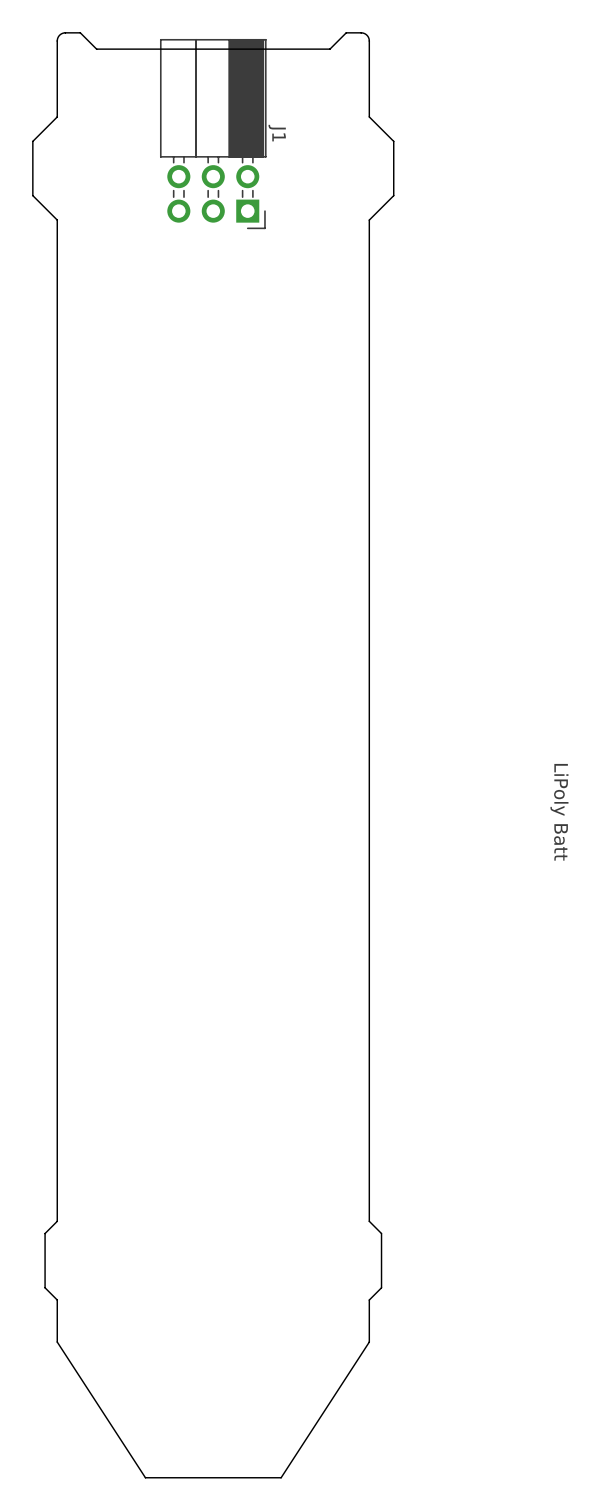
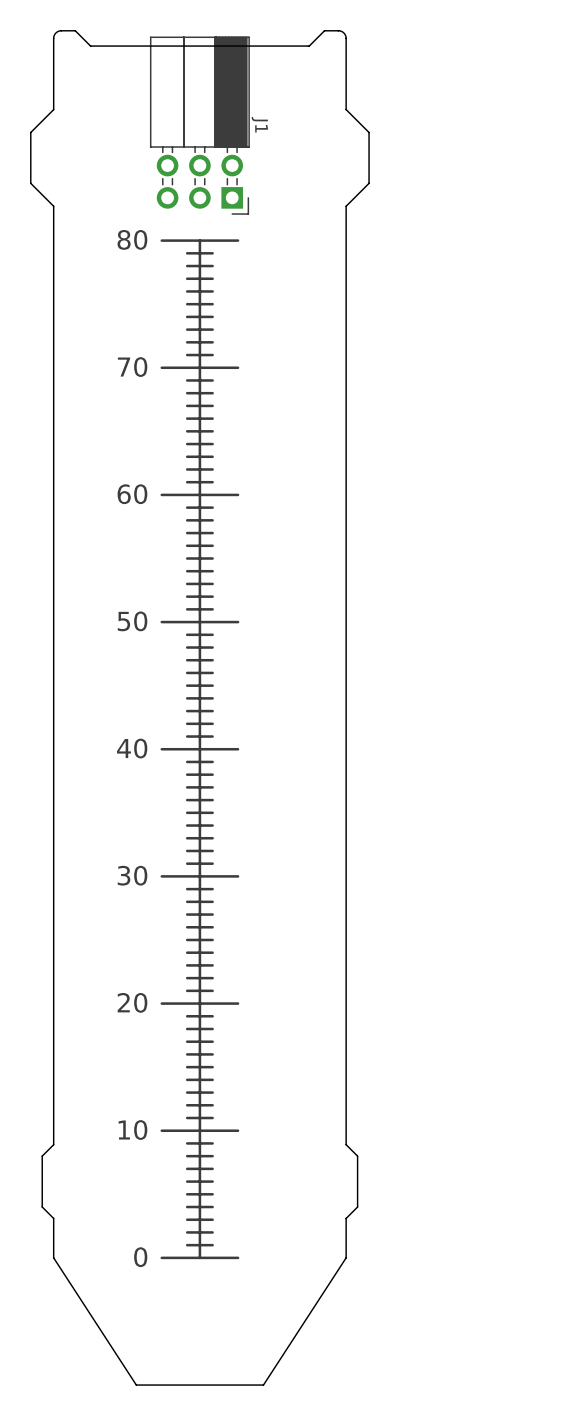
text: none -> 80 (132, 239)
line: none -> (199, 240) (199, 1257)
line: none -> (238, 240) (161, 240)
line: none -> (212, 253) (187, 253)
line: none -> (212, 266) (187, 266)
line: none -> (212, 278) (187, 278)
line: none -> (212, 291) (187, 291)
line: none -> (212, 304) (187, 304)
line: none -> (212, 316) (187, 316)
line: none -> (212, 329) (187, 329)
line: none -> (212, 342) (187, 342)
line: none -> (212, 355) (187, 355)
text: none -> 70 (132, 367)
line: none -> (238, 367) (161, 367)
line: none -> (212, 380) (187, 380)
line: none -> (212, 393) (187, 393)
line: none -> (212, 405) (187, 405)
line: none -> (212, 418) (187, 418)
line: none -> (212, 431) (187, 431)
line: none -> (212, 444) (187, 444)
line: none -> (212, 456) (187, 456)
line: none -> (212, 469) (187, 469)
line: none -> (212, 482) (187, 482)
text: none -> 60 (132, 494)
line: none -> (238, 494) (161, 494)
line: none -> (212, 507) (187, 507)
line: none -> (212, 520) (187, 520)
line: none -> (212, 533) (187, 533)
line: none -> (212, 545) (187, 545)
line: none -> (212, 558) (187, 558)
line: none -> (212, 571) (187, 571)
line: none -> (212, 583) (187, 583)
line: none -> (212, 596) (187, 596)
line: none -> (212, 609) (187, 609)
text: none -> 50 (132, 621)
line: none -> (238, 622) (161, 622)
line: none -> (212, 634) (187, 634)
line: none -> (212, 647) (187, 647)
line: none -> (212, 660) (187, 660)
line: none -> (212, 672) (187, 672)
line: none -> (212, 685) (187, 685)
line: none -> (212, 698) (187, 698)
line: none -> (212, 711) (187, 711)
line: none -> (212, 723) (187, 723)
line: none -> (212, 736) (187, 736)
text: none -> 40 (132, 748)
line: none -> (238, 749) (161, 749)
line: none -> (212, 761) (187, 761)
text: LiPoly Batt (559, 812) -> none
line: none -> (212, 774) (187, 774)
line: none -> (212, 787) (187, 787)
line: none -> (212, 800) (187, 800)
line: none -> (212, 812) (187, 812)
line: none -> (212, 825) (187, 825)
line: none -> (212, 838) (187, 838)
line: none -> (212, 850) (187, 850)
line: none -> (212, 863) (187, 863)
text: none -> 30 (132, 875)
line: none -> (238, 876) (161, 876)
line: none -> (212, 889) (187, 889)
line: none -> (212, 901) (187, 901)
line: none -> (212, 914) (187, 914)
line: none -> (212, 927) (187, 927)
line: none -> (212, 939) (187, 939)
line: none -> (212, 952) (187, 952)
line: none -> (212, 965) (187, 965)
line: none -> (212, 978) (187, 978)
line: none -> (212, 990) (187, 990)
text: none -> 20 (132, 1002)
line: none -> (238, 1003) (161, 1003)
line: none -> (212, 1016) (187, 1016)
line: none -> (212, 1028) (187, 1028)
line: none -> (212, 1041) (187, 1041)
line: none -> (212, 1054) (187, 1054)
line: none -> (212, 1067) (187, 1067)
line: none -> (212, 1079) (187, 1079)
line: none -> (212, 1092) (187, 1092)
line: none -> (212, 1105) (187, 1105)
line: none -> (212, 1118) (187, 1118)
text: none -> 10 (132, 1130)
line: none -> (238, 1130) (161, 1130)
line: none -> (212, 1143) (187, 1143)
line: none -> (212, 1156) (187, 1156)
line: none -> (212, 1168) (187, 1168)
line: none -> (212, 1181) (187, 1181)
line: none -> (212, 1194) (187, 1194)
line: none -> (212, 1207) (187, 1207)
line: none -> (212, 1219) (187, 1219)
line: none -> (212, 1232) (187, 1232)
line: none -> (212, 1245) (187, 1245)
text: none -> 0 (140, 1257)
line: none -> (238, 1257) (161, 1257)

